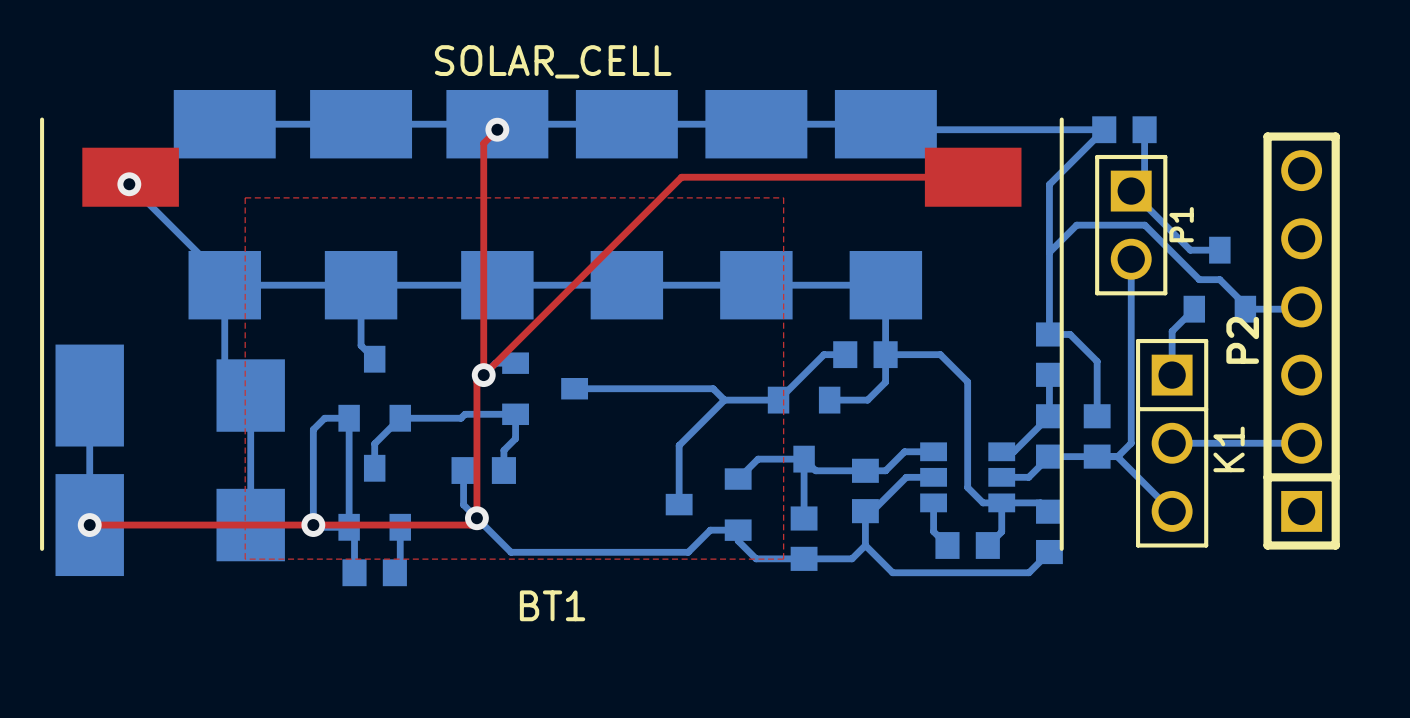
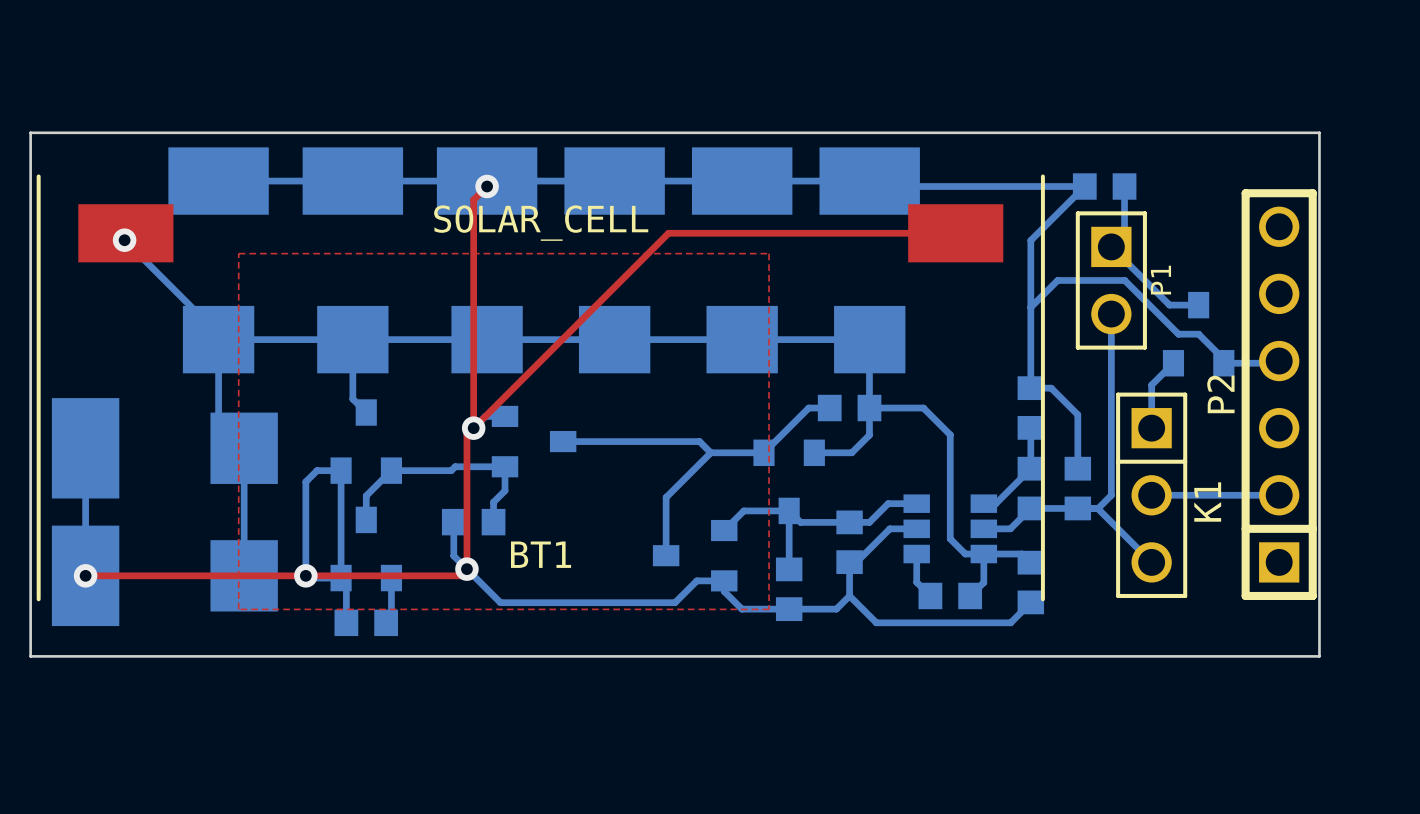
BT1 value position: SOLAR_CELL (553, 61) -> SOLAR_CELL (541, 223)
board edge: none -> (30, 132) (30, 656) (1319, 656) (1319, 132) (30, 132)
BT1 name position: BT1 (552, 605) -> BT1 (541, 554)

